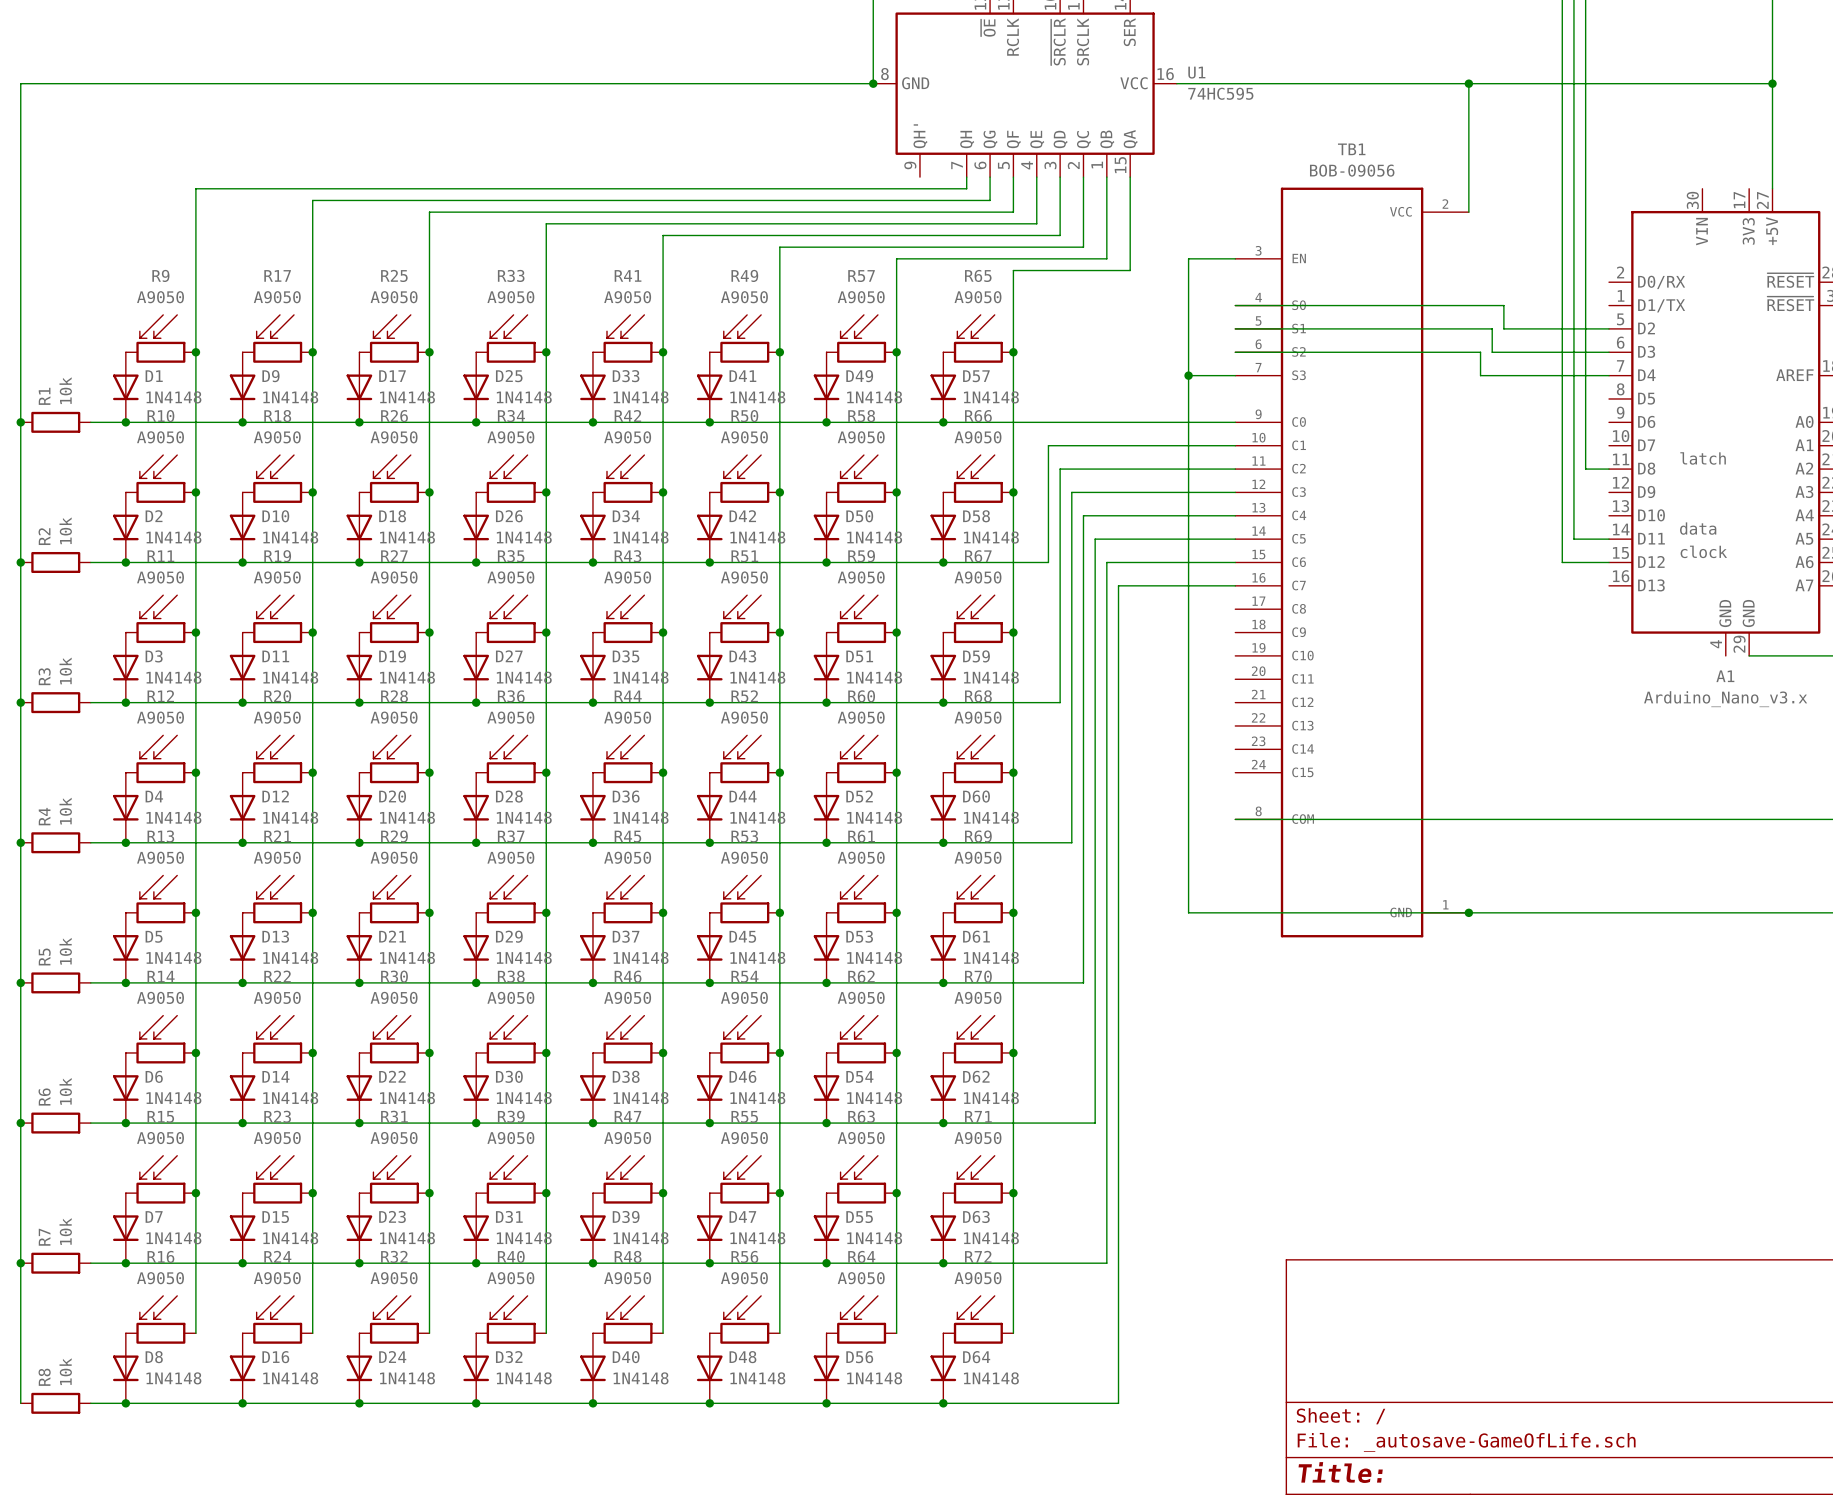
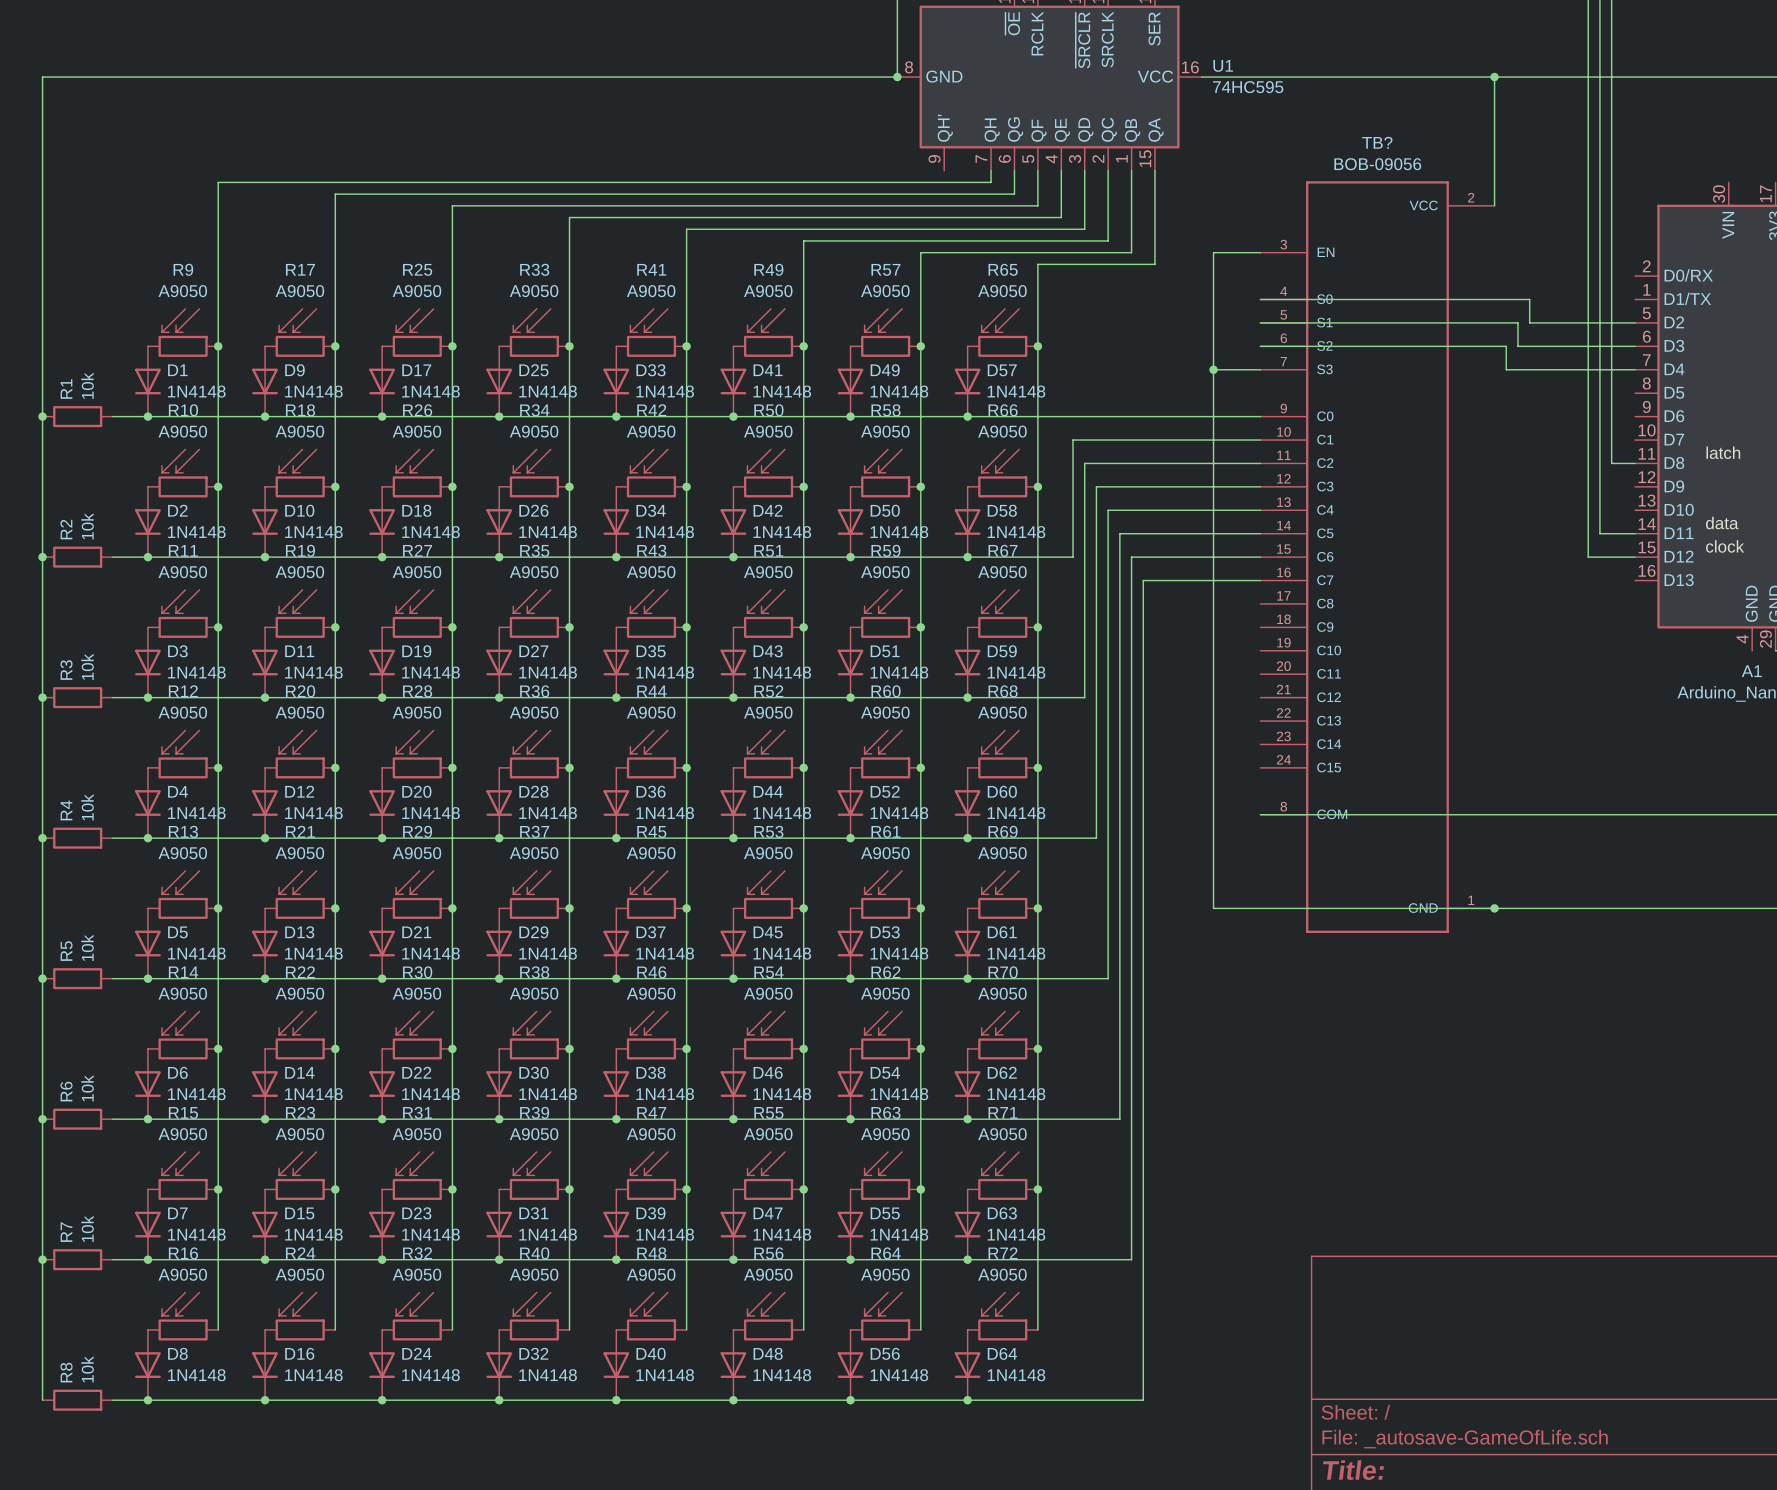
TB1 name: TB1 (1351, 149) -> TB? (1377, 142)

